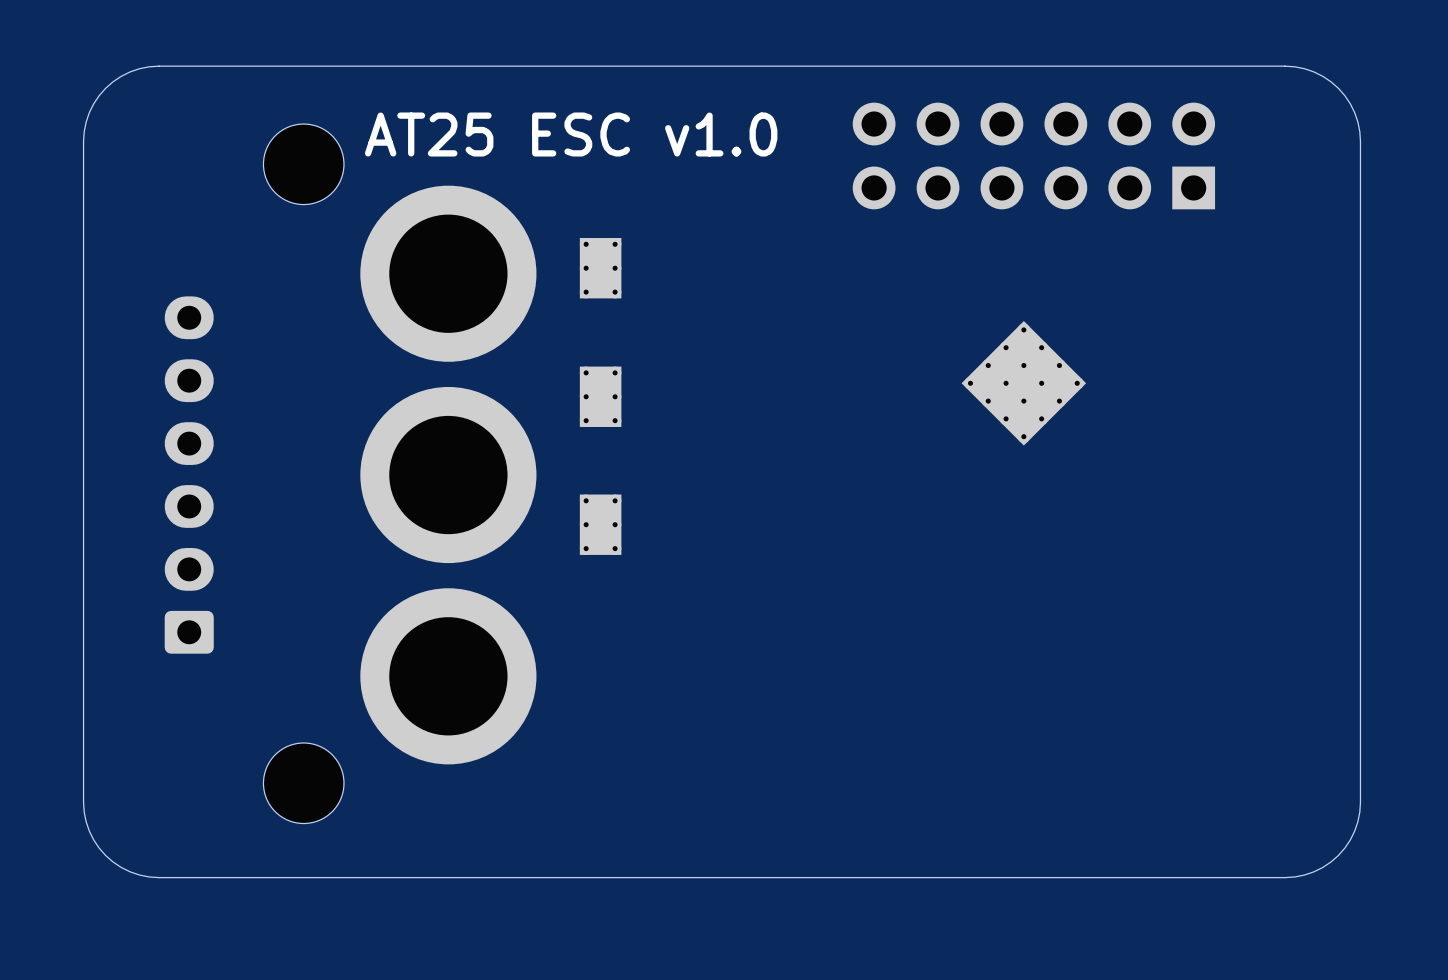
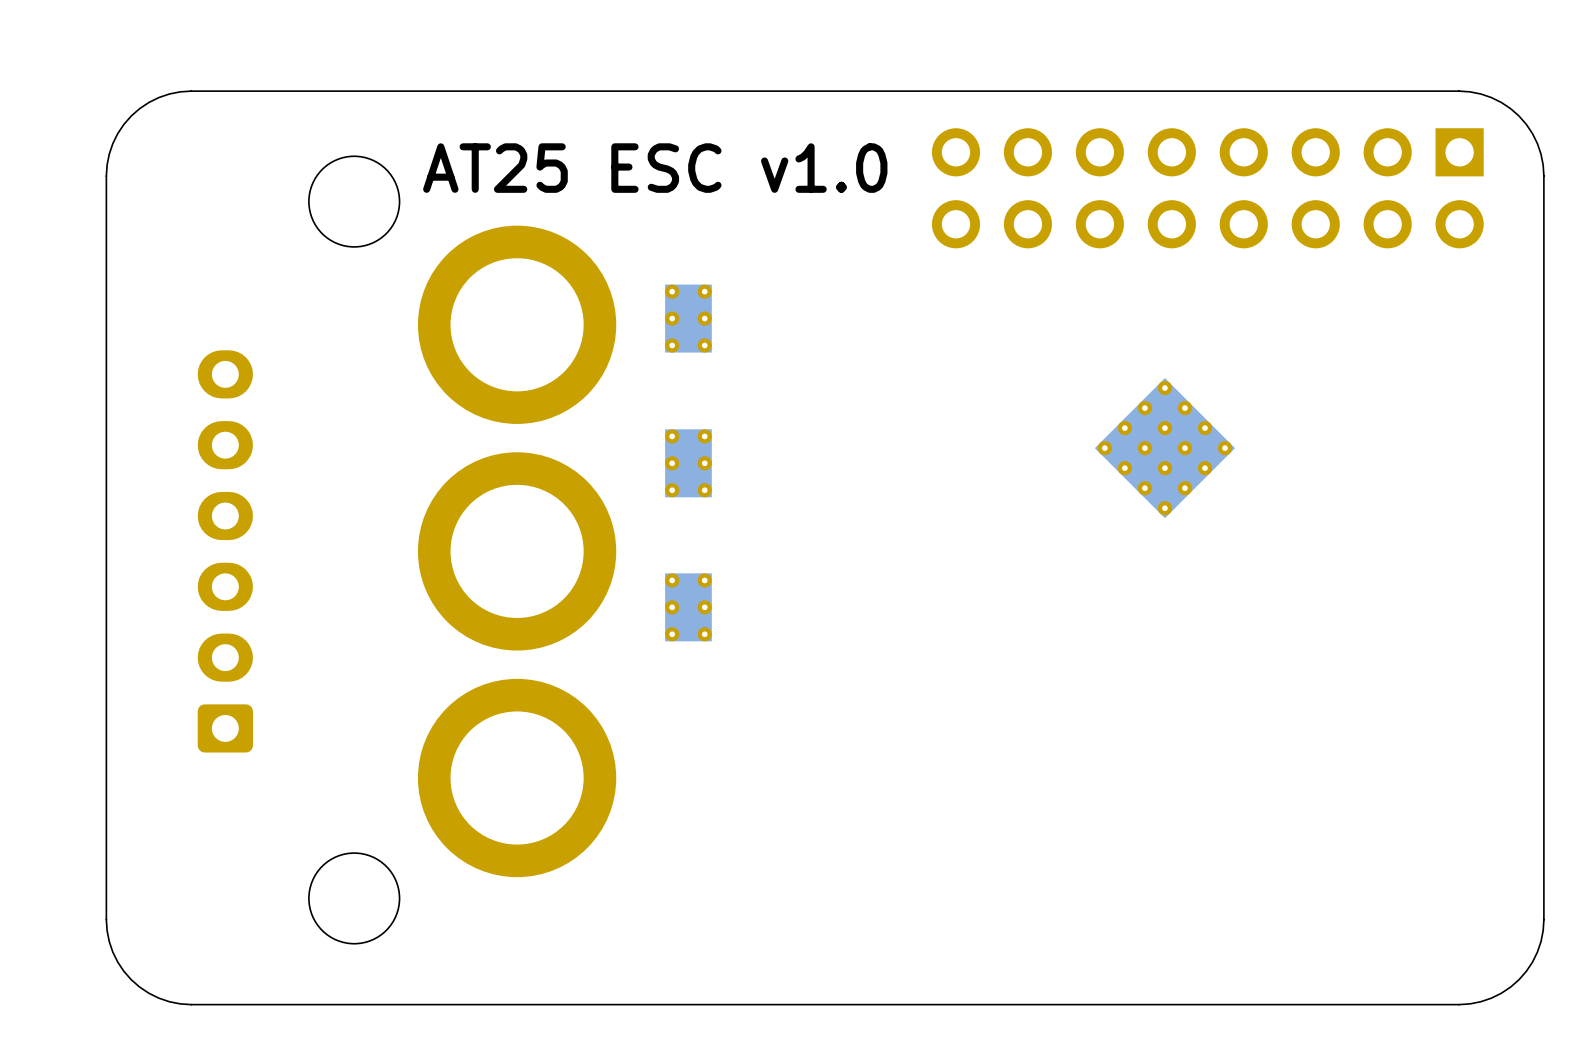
part: none -> (1207, 188)
part: (1033, 155) -> none

